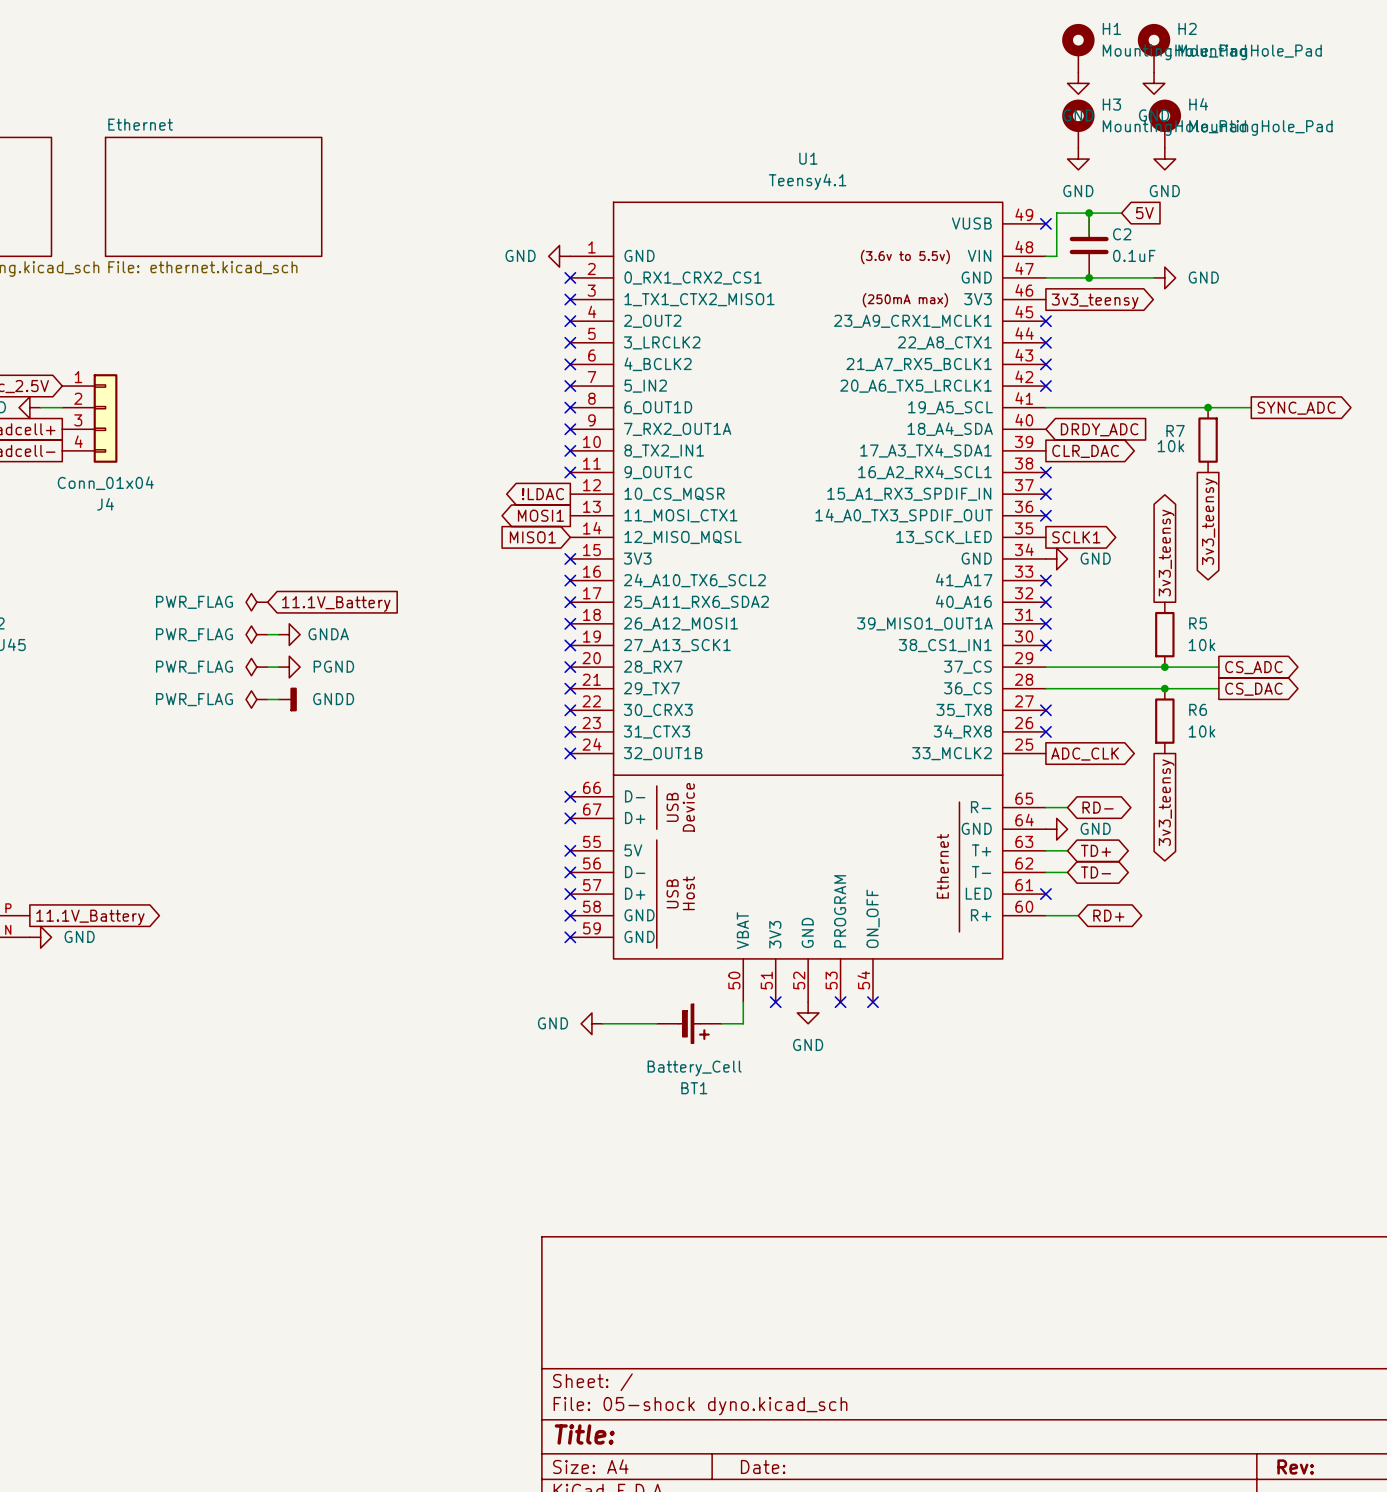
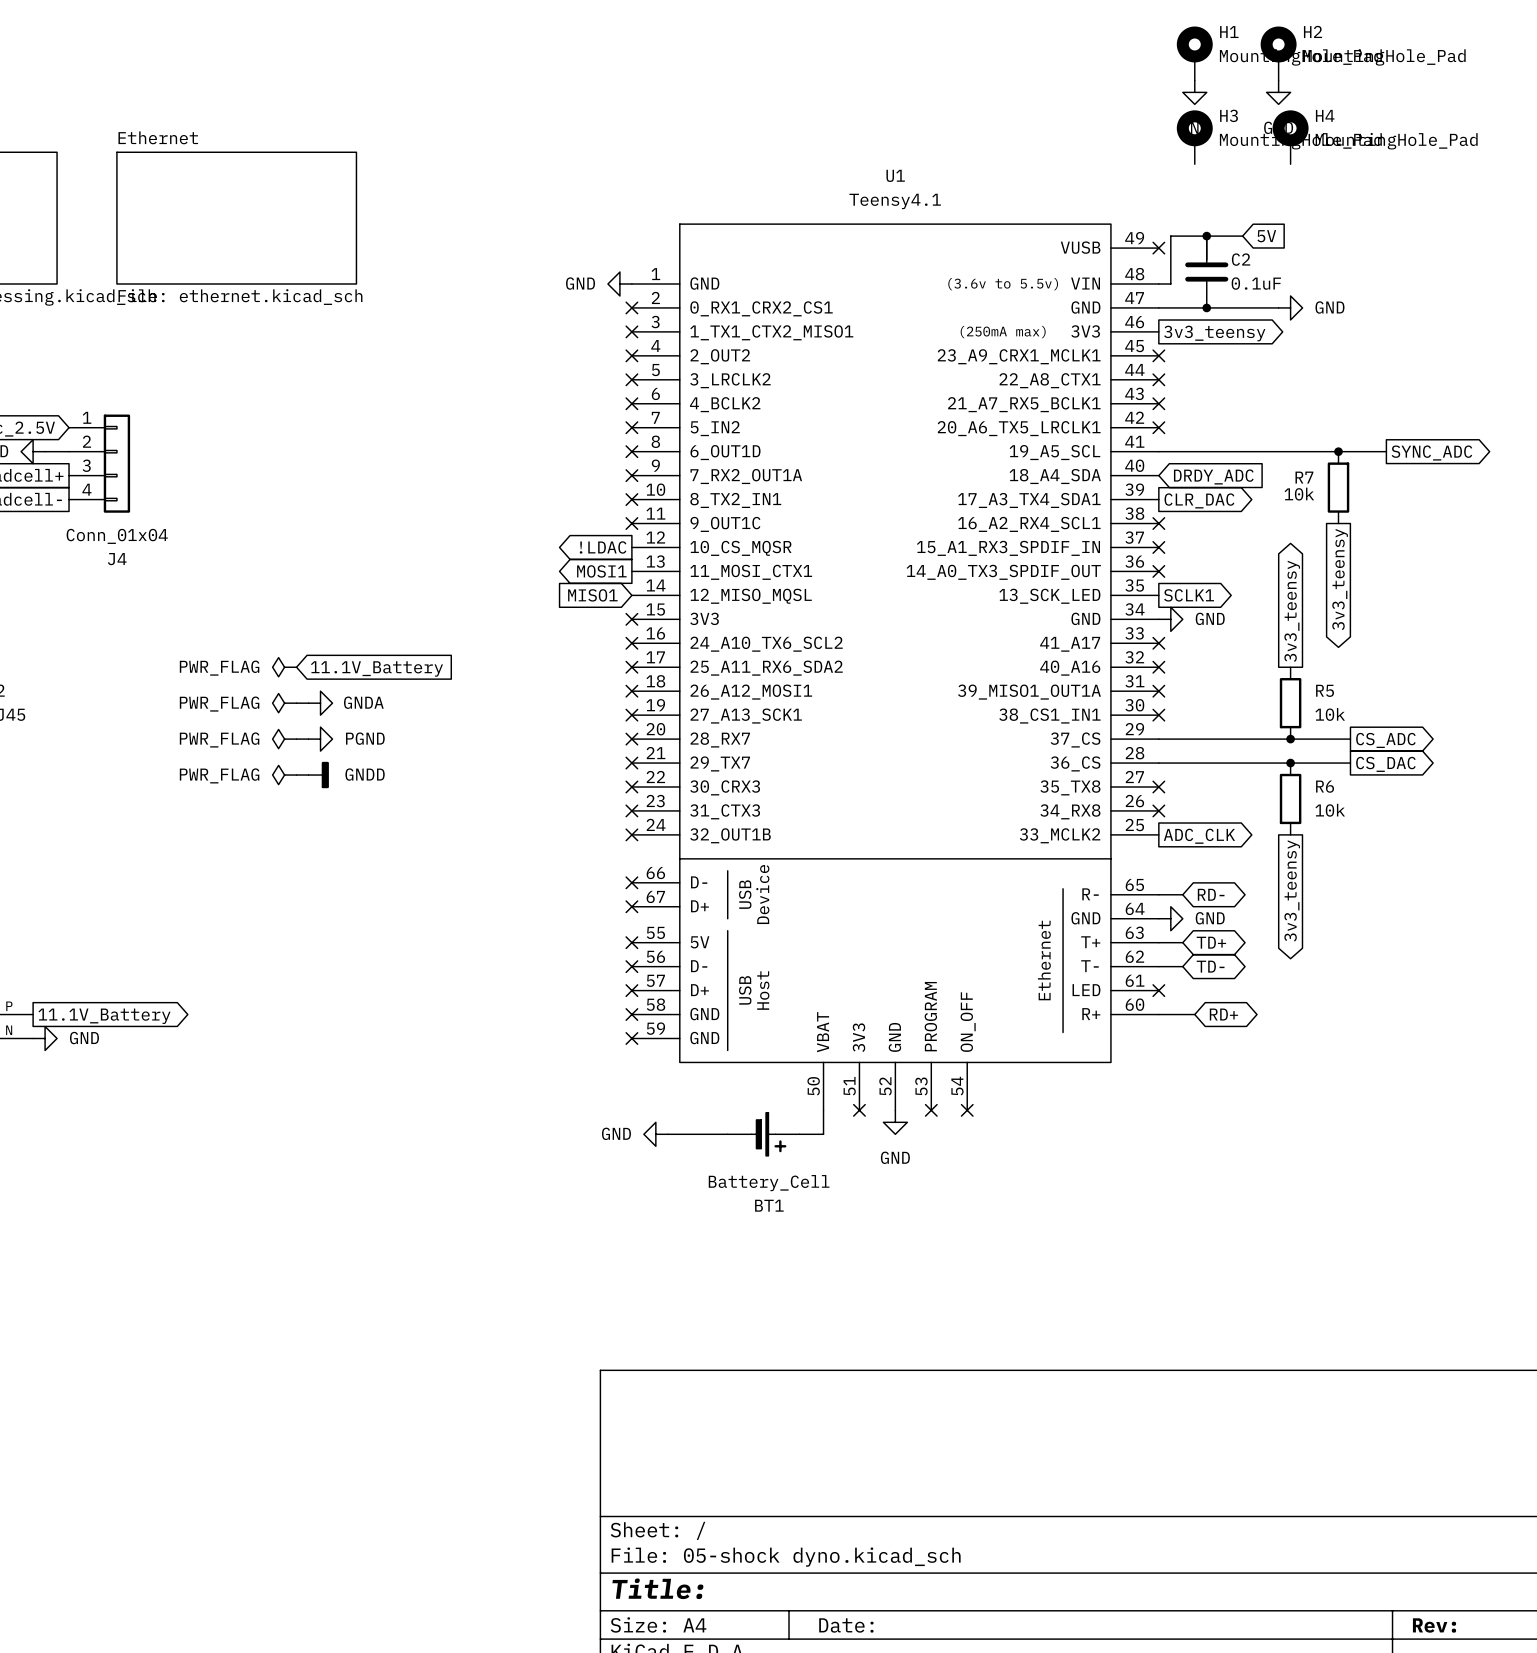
power symbol: GND (1078, 159) -> none
power symbol: GND (1164, 159) -> none

